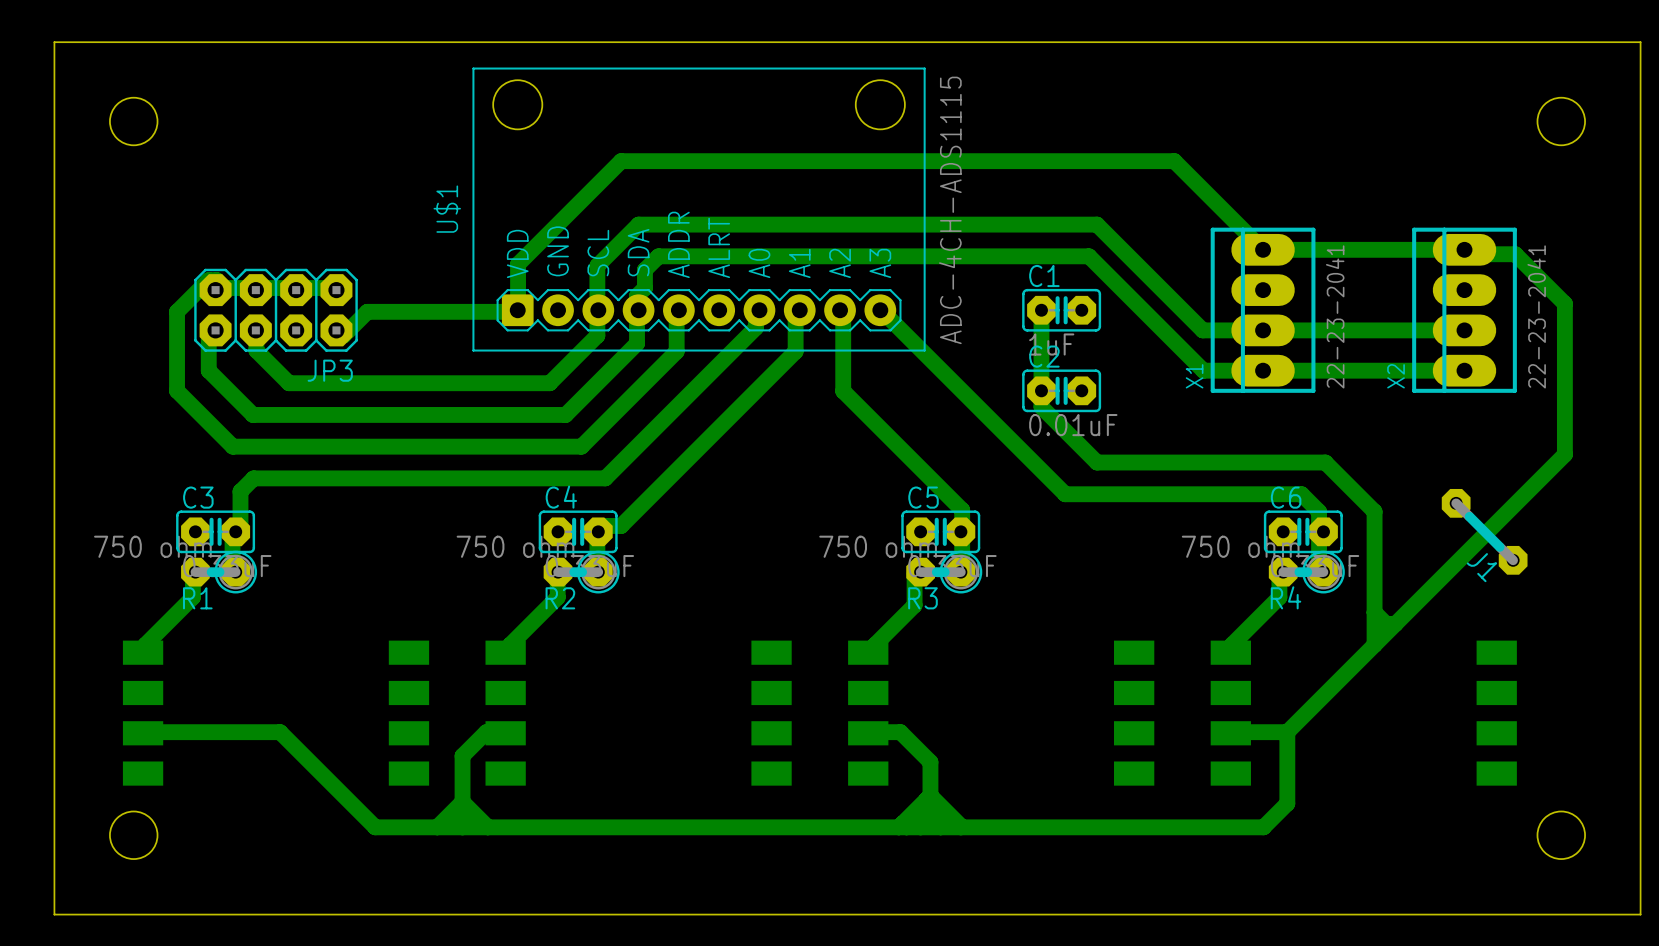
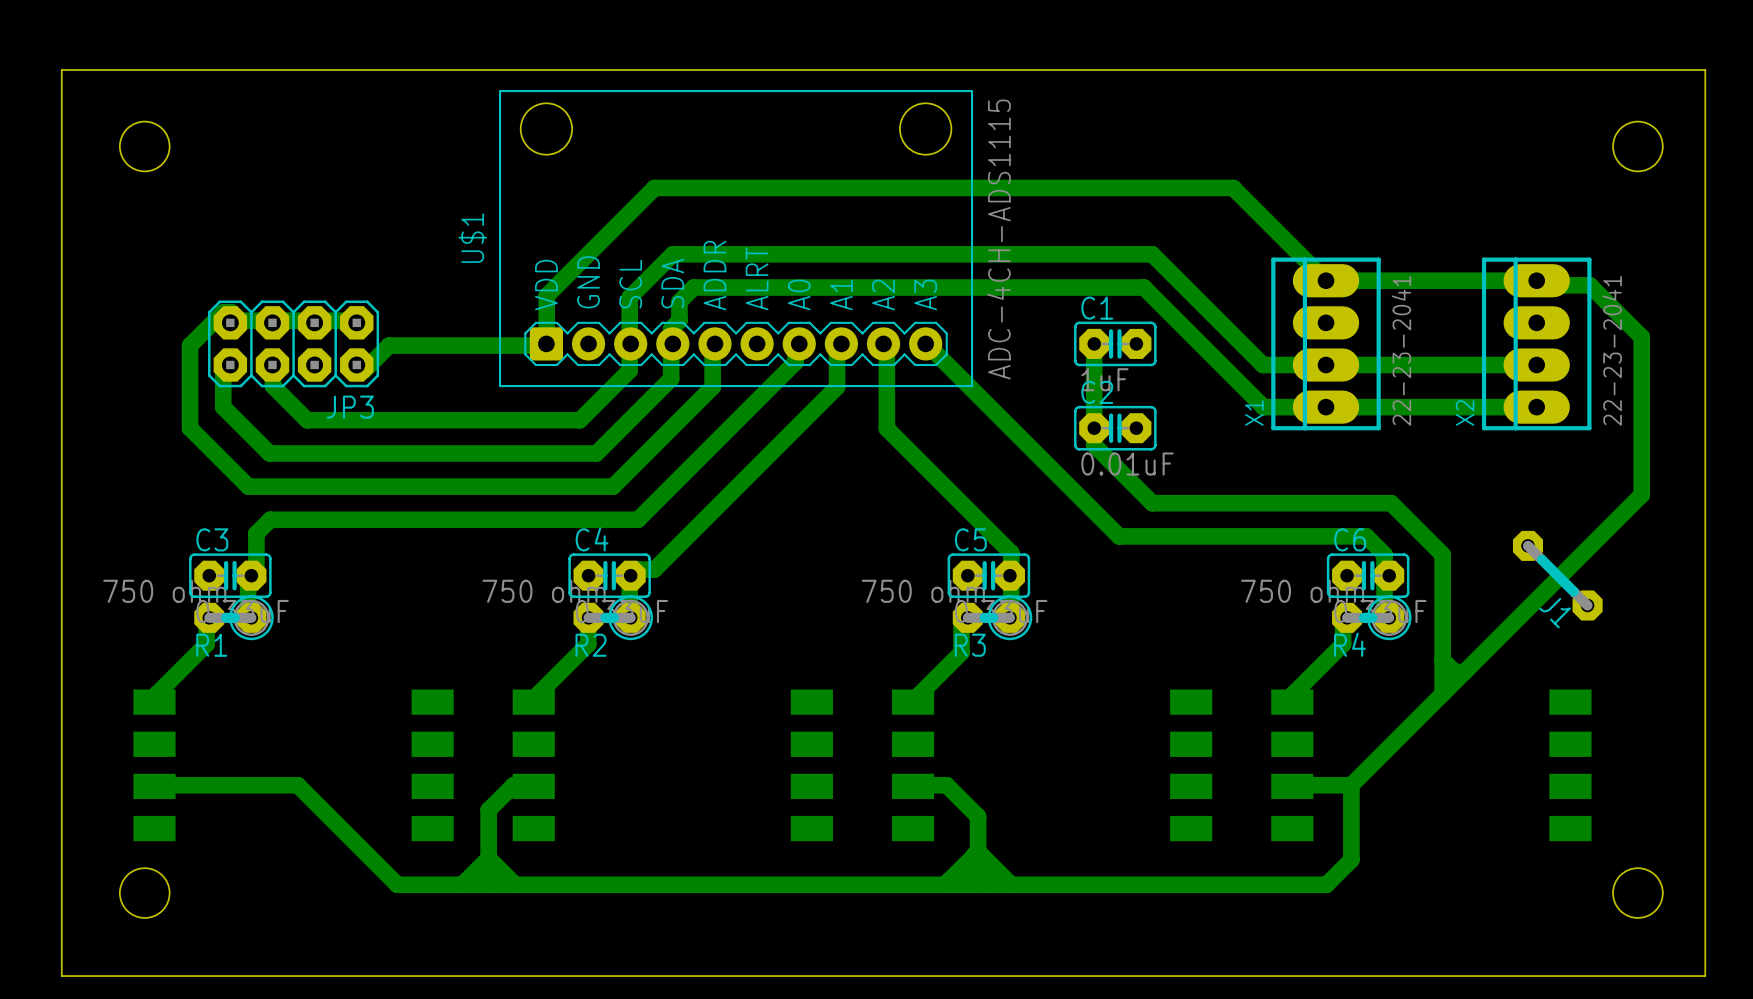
board edge: (54, 48) (54, 42) (1640, 42) (1640, 914) (1625, 914) -> (61, 70) (1705, 70) (1705, 976)

